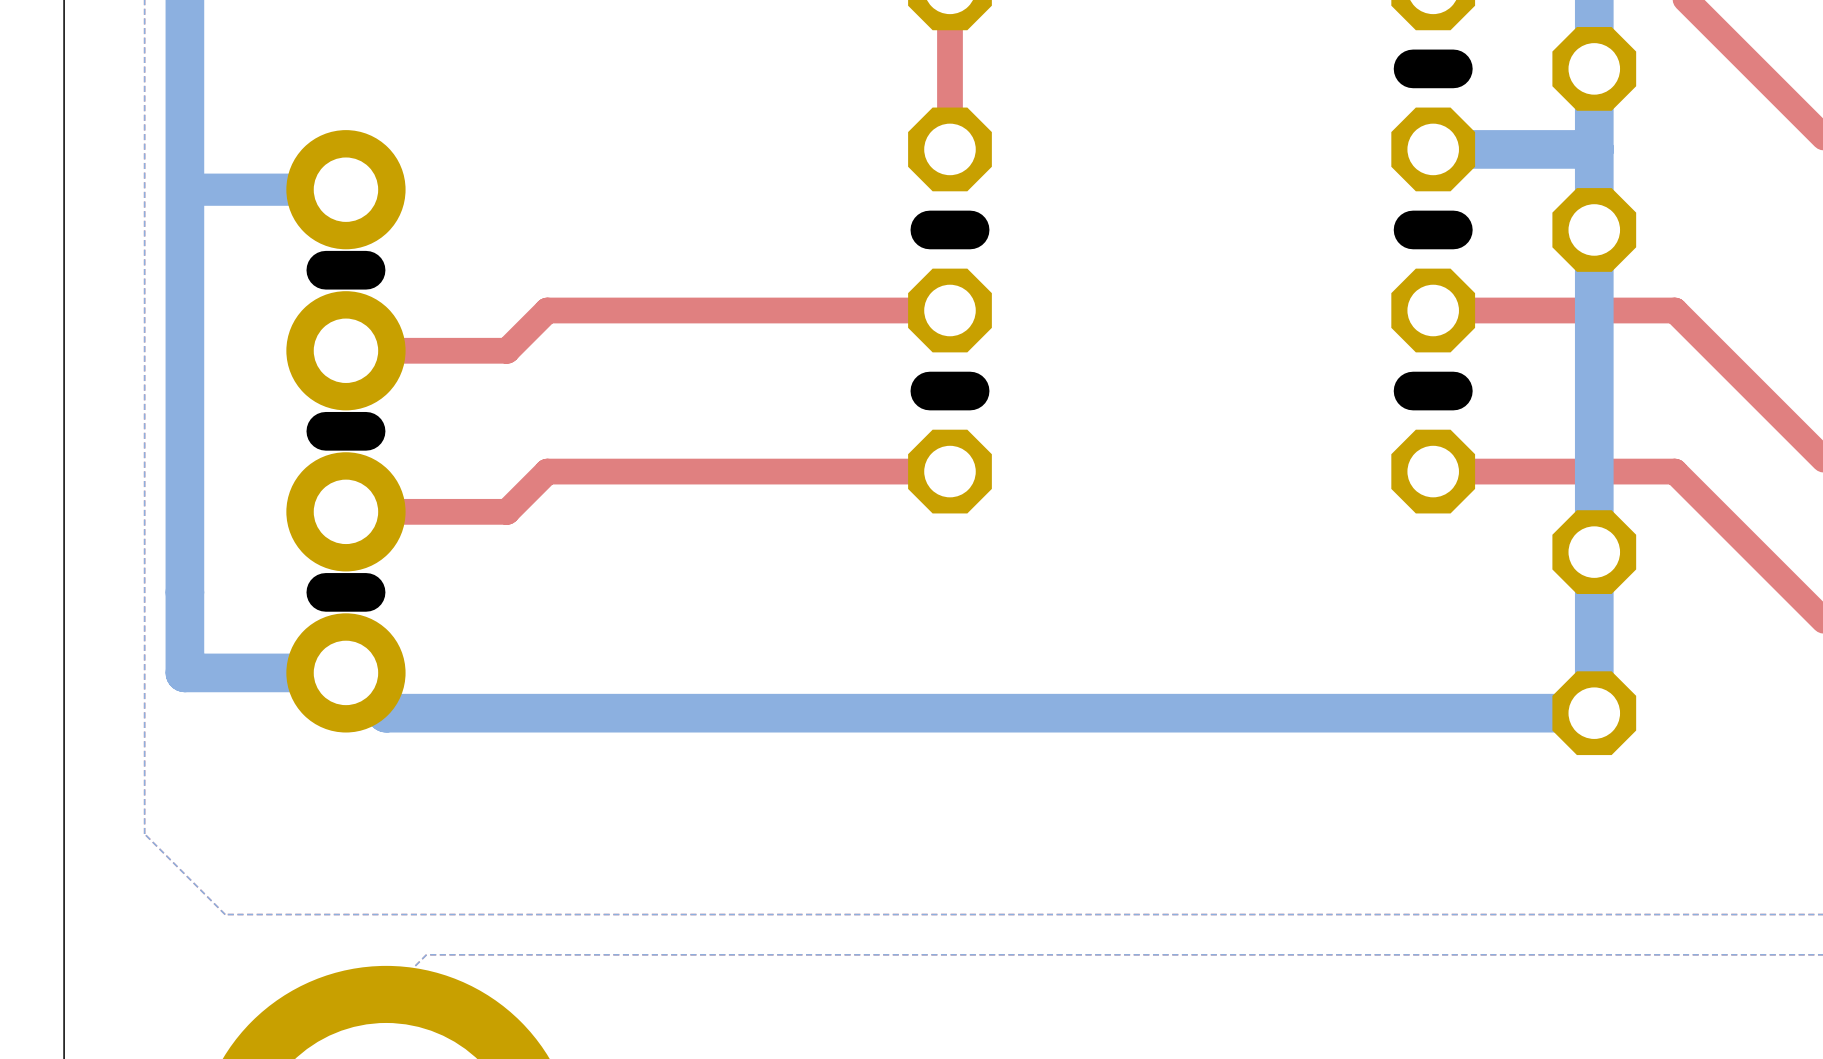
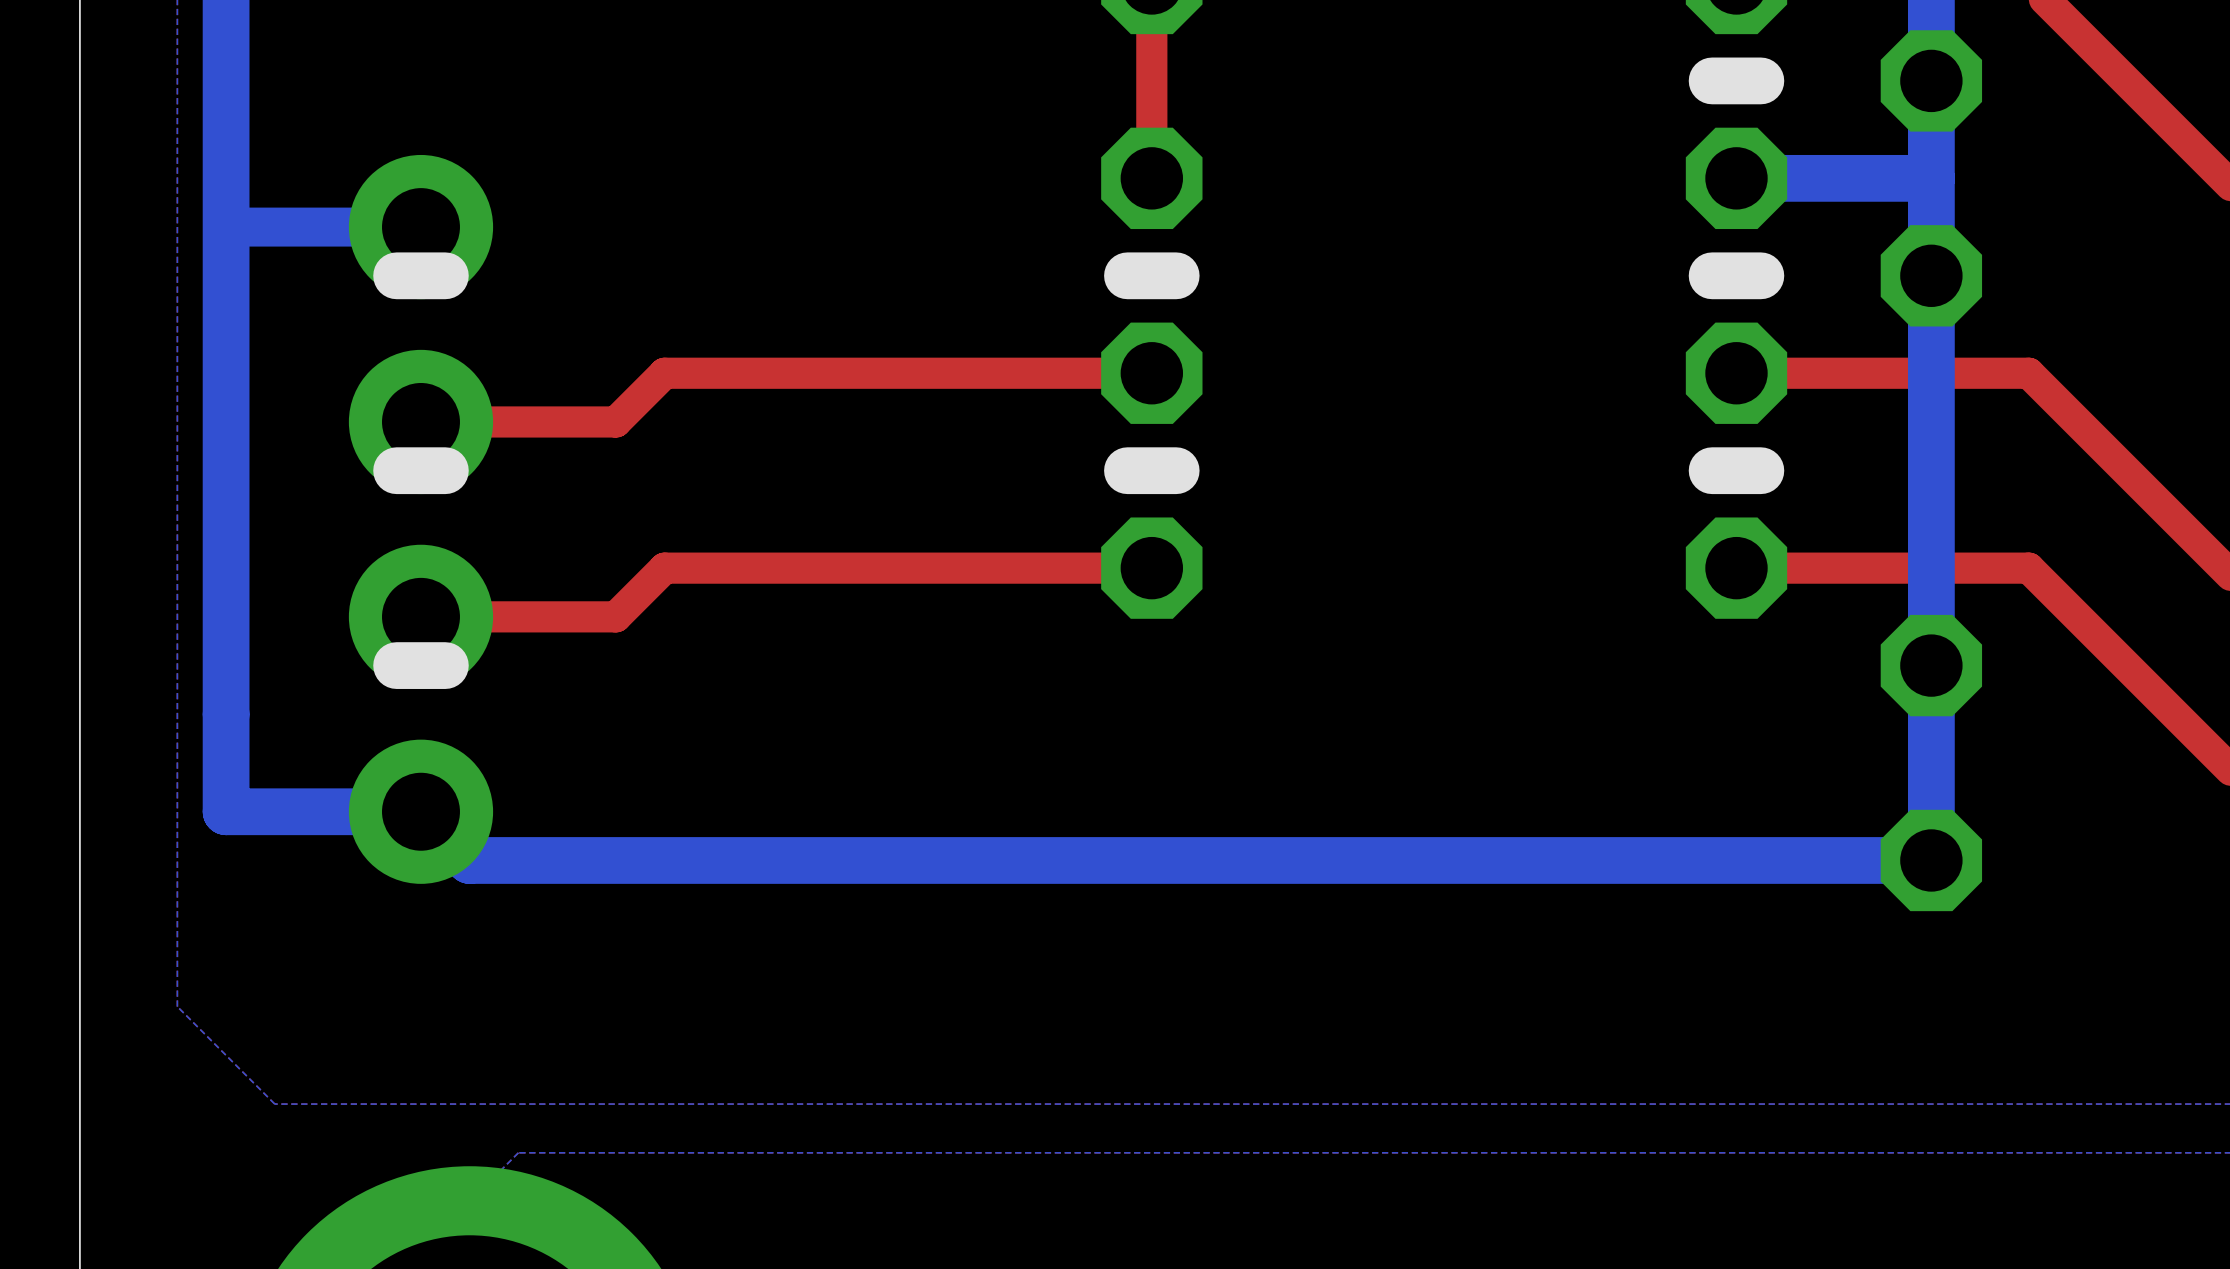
line: (366, 270) (325, 270) -> (445, 275) (396, 275)
line: (366, 431) (325, 431) -> (445, 470) (396, 470)
line: (366, 592) (325, 592) -> (445, 665) (396, 665)

